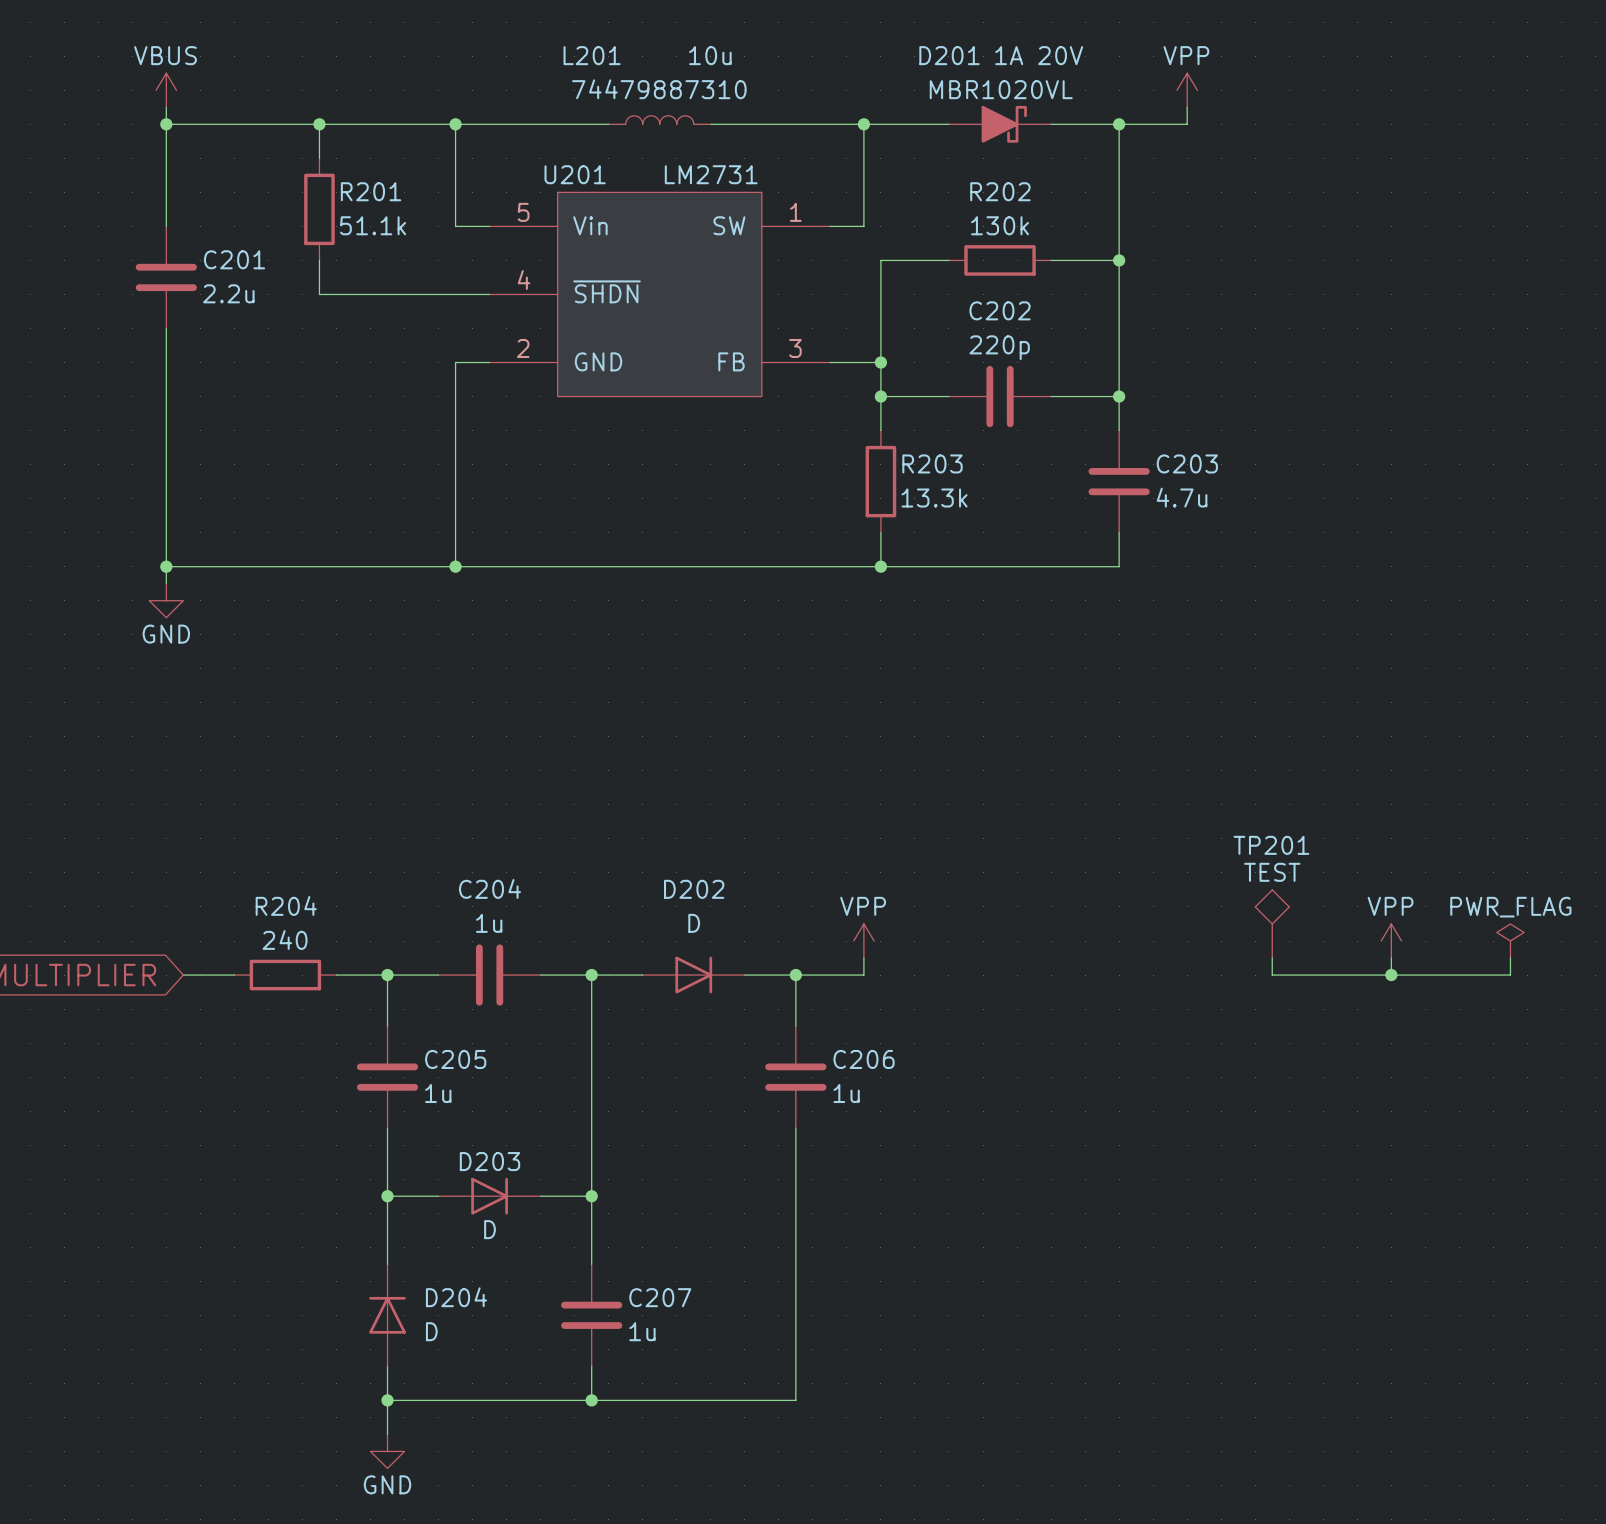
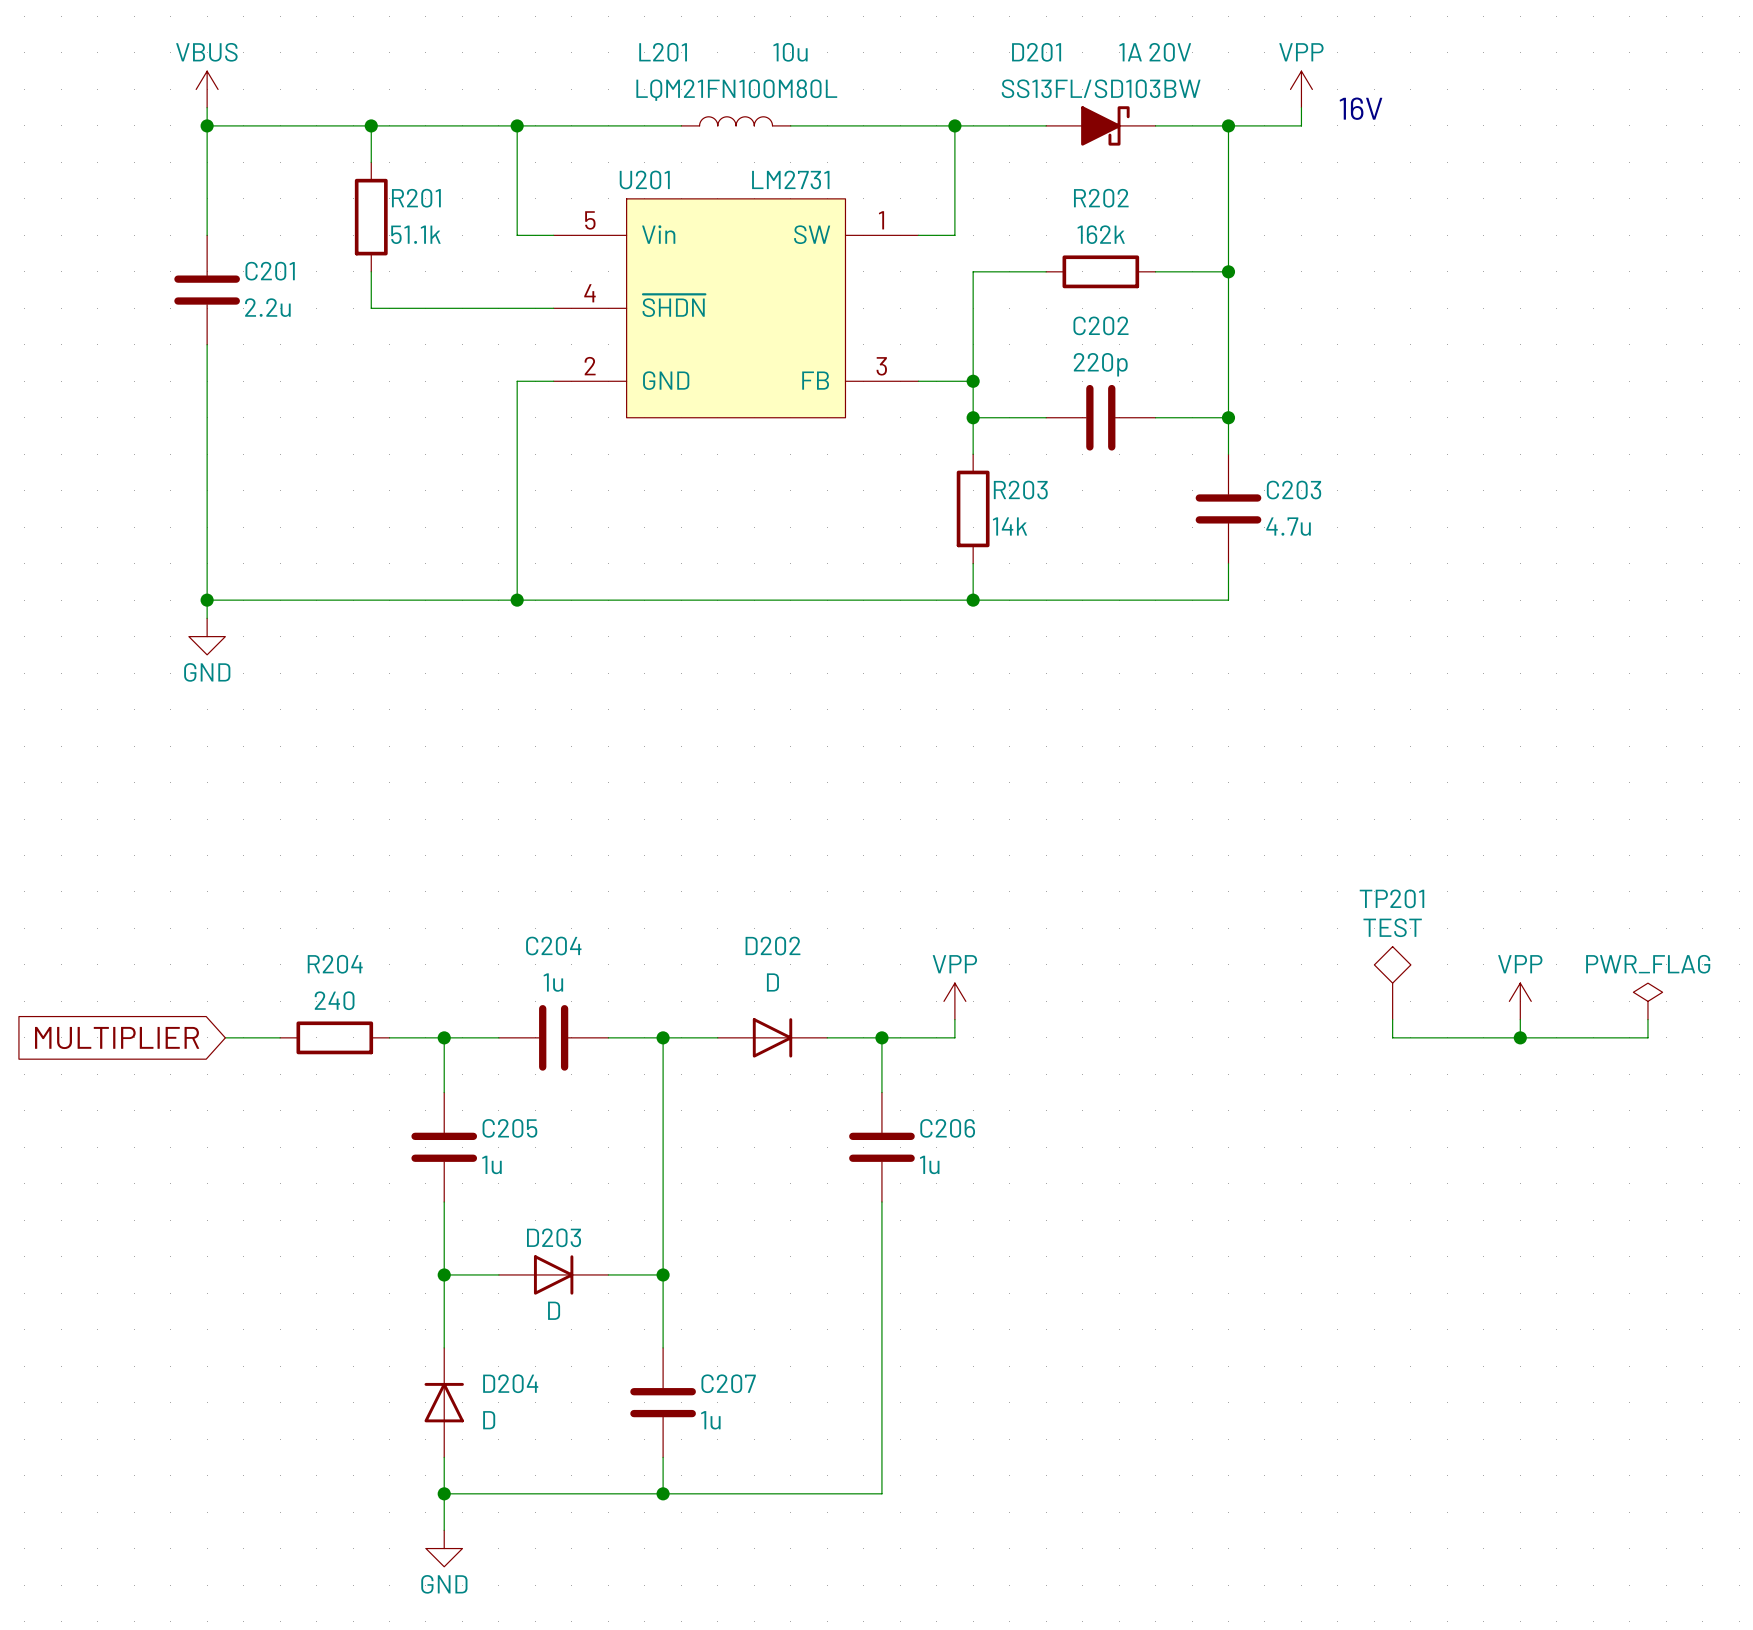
L201 text: 74479887310 (659, 89) -> LQM21FN100M80L (736, 90)
D201 text: MBR1020VL (1001, 89) -> SS13FL/SD103BW (1101, 88)
text: none -> 16V (1361, 108)
R202 value: 130k (1000, 225) -> 162k (1101, 234)
R203 value: 13.3k (934, 498) -> 14k (1010, 526)

